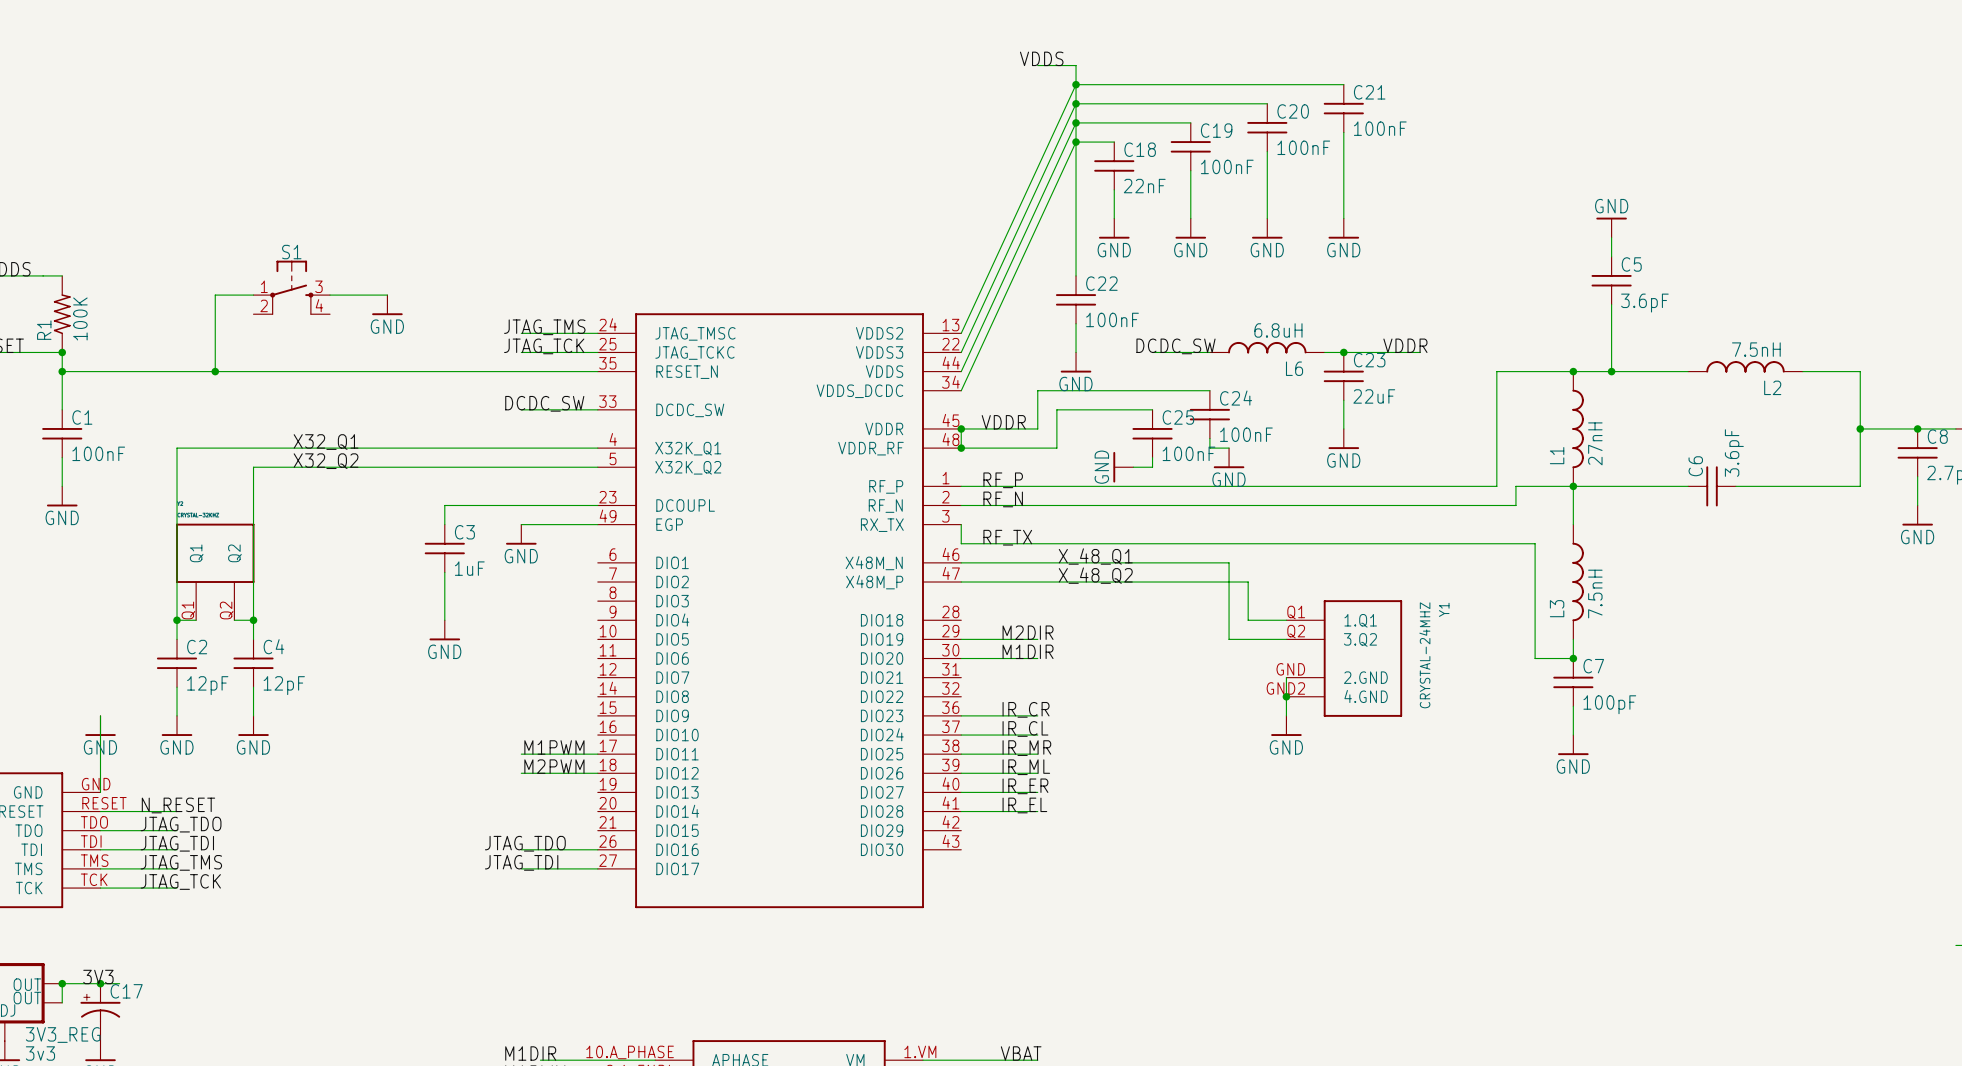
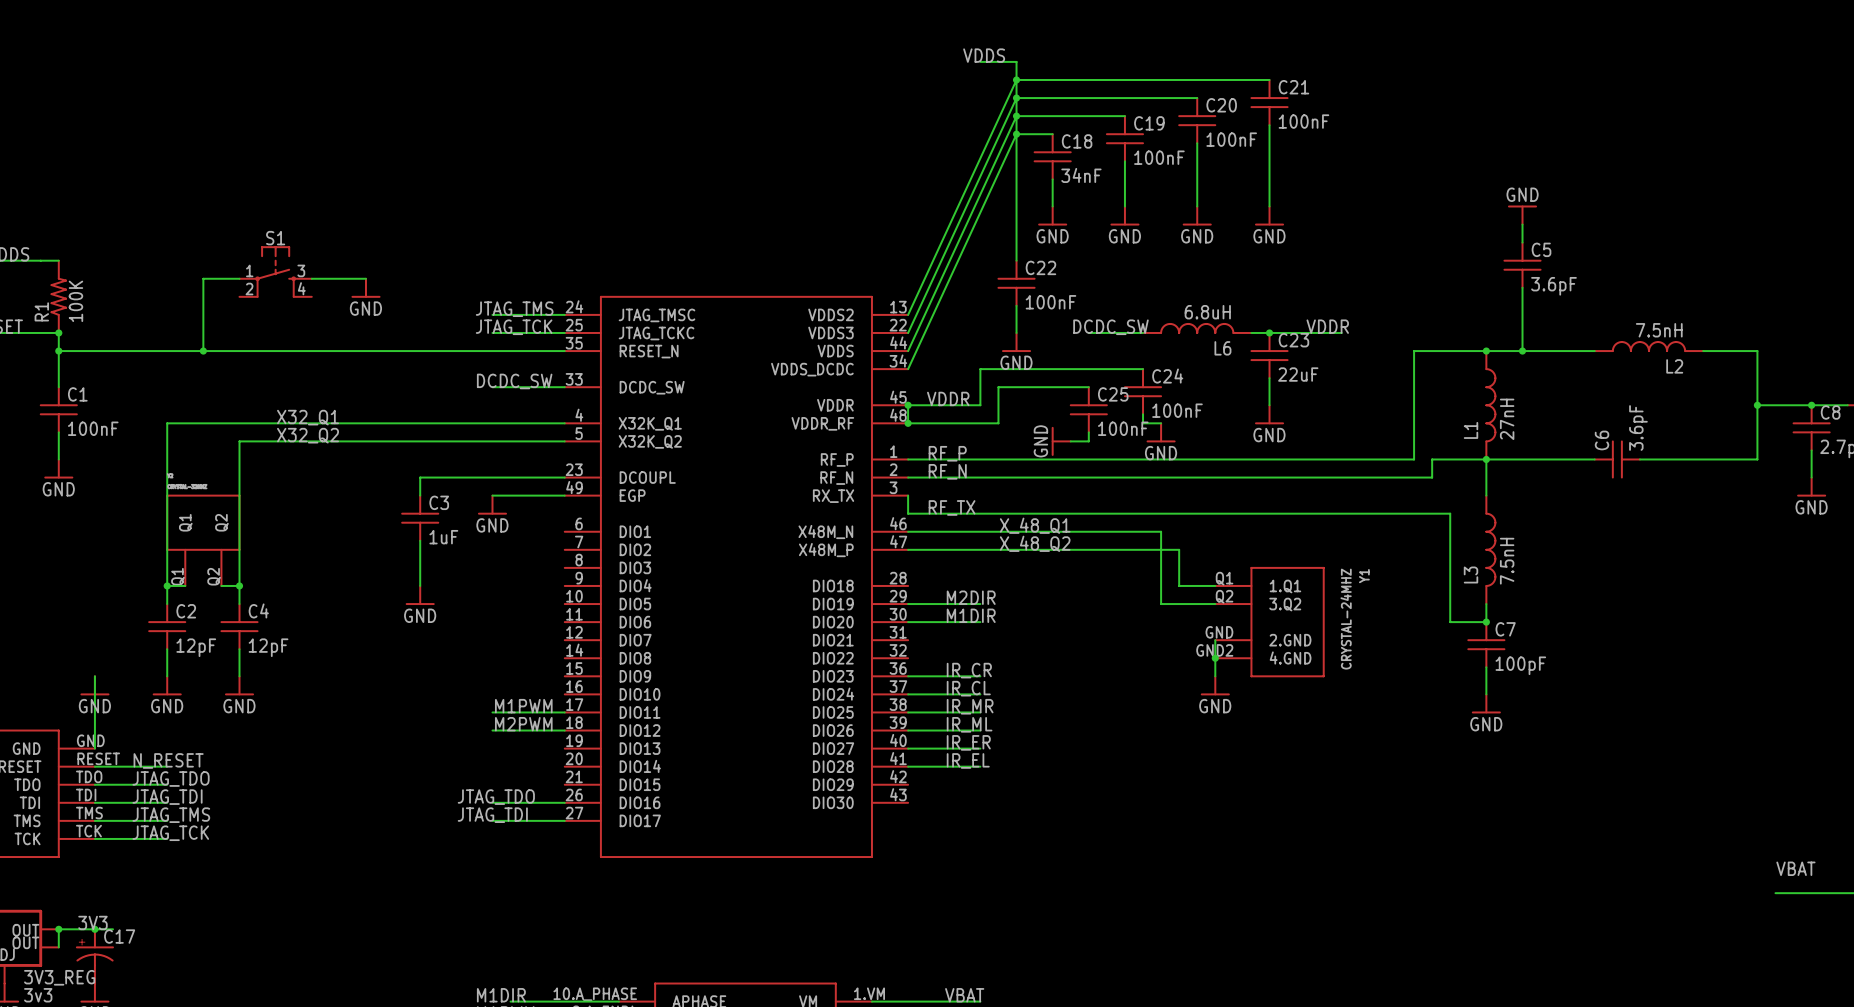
C18 value: 22nF (1144, 186) -> 34nF (1081, 175)
label: none -> VBAT (1795, 868)
wire: none -> (1775, 893) (1847, 893)

